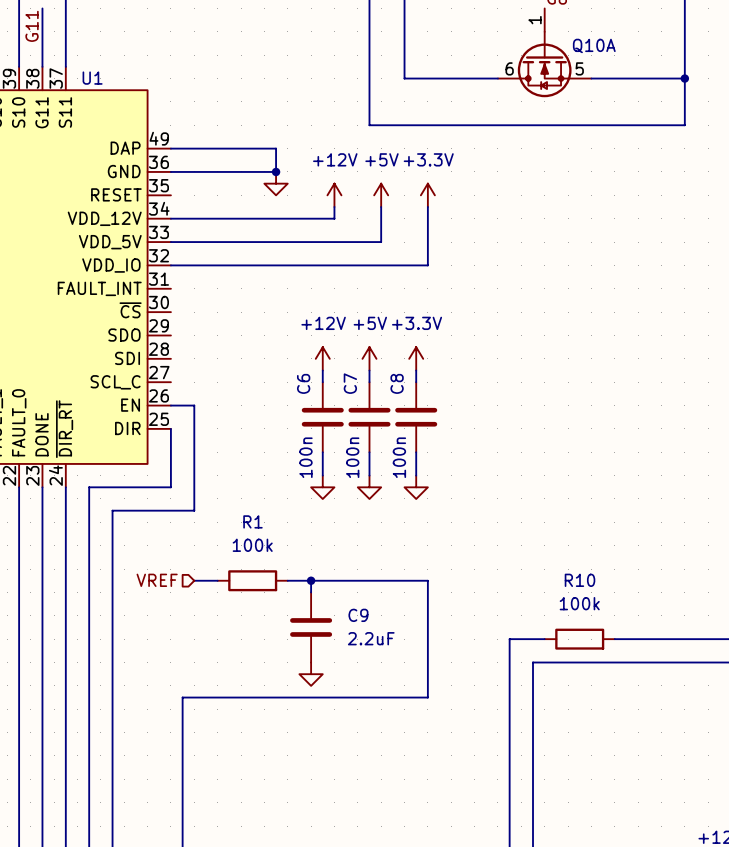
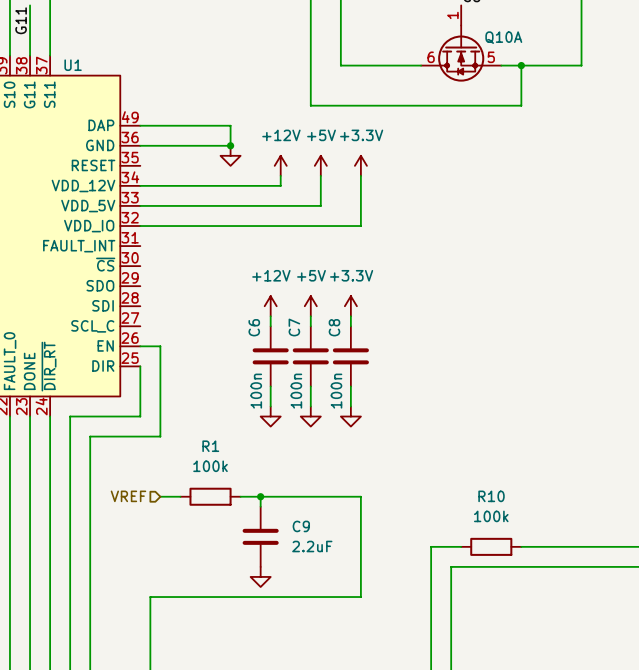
junction: none -> (521, 65)
wire: (684, 78) (684, 125) (614, 125) -> (521, 65) (521, 105)
junction: (684, 78) -> none

